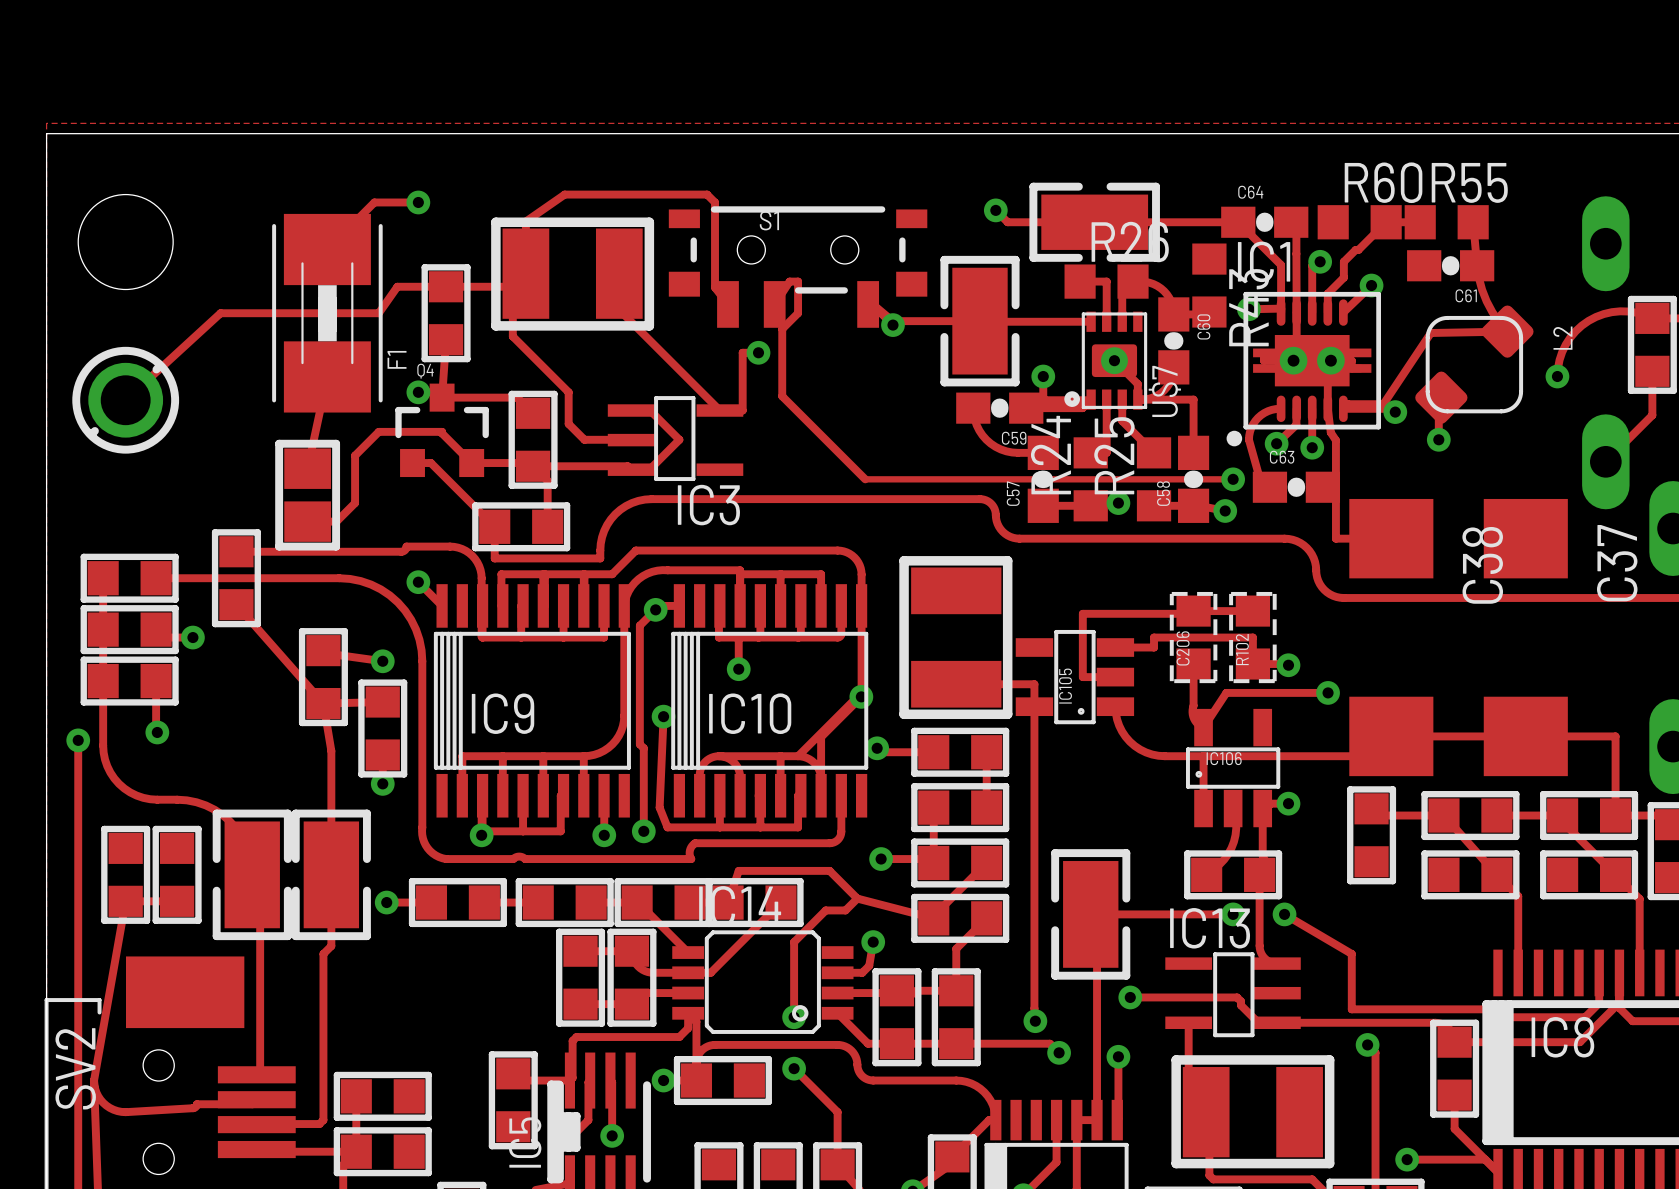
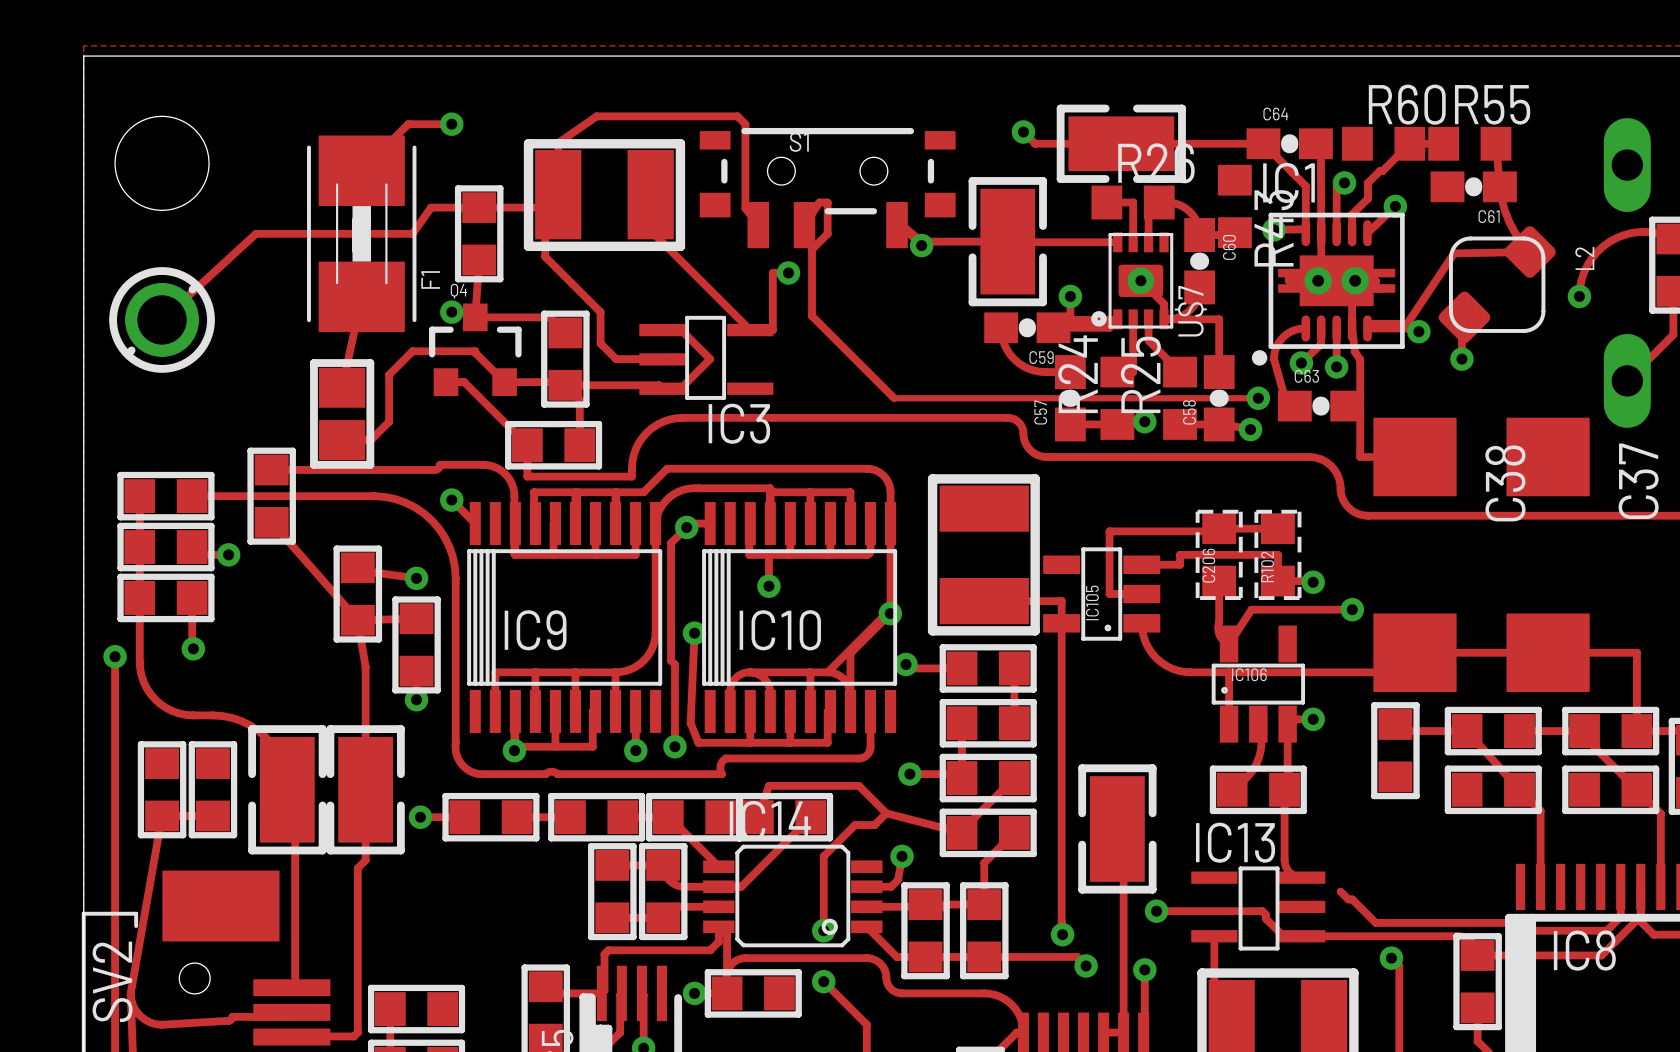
track: (1090, 914) (1233, 914) -> none
via: (1233, 914) -> none
via: (1284, 914) -> none
track: (1288, 914) (1284, 914) (1351, 953) (1351, 1009) -> (1340, 891) (1348, 899) (1352, 899) (1375, 922)

